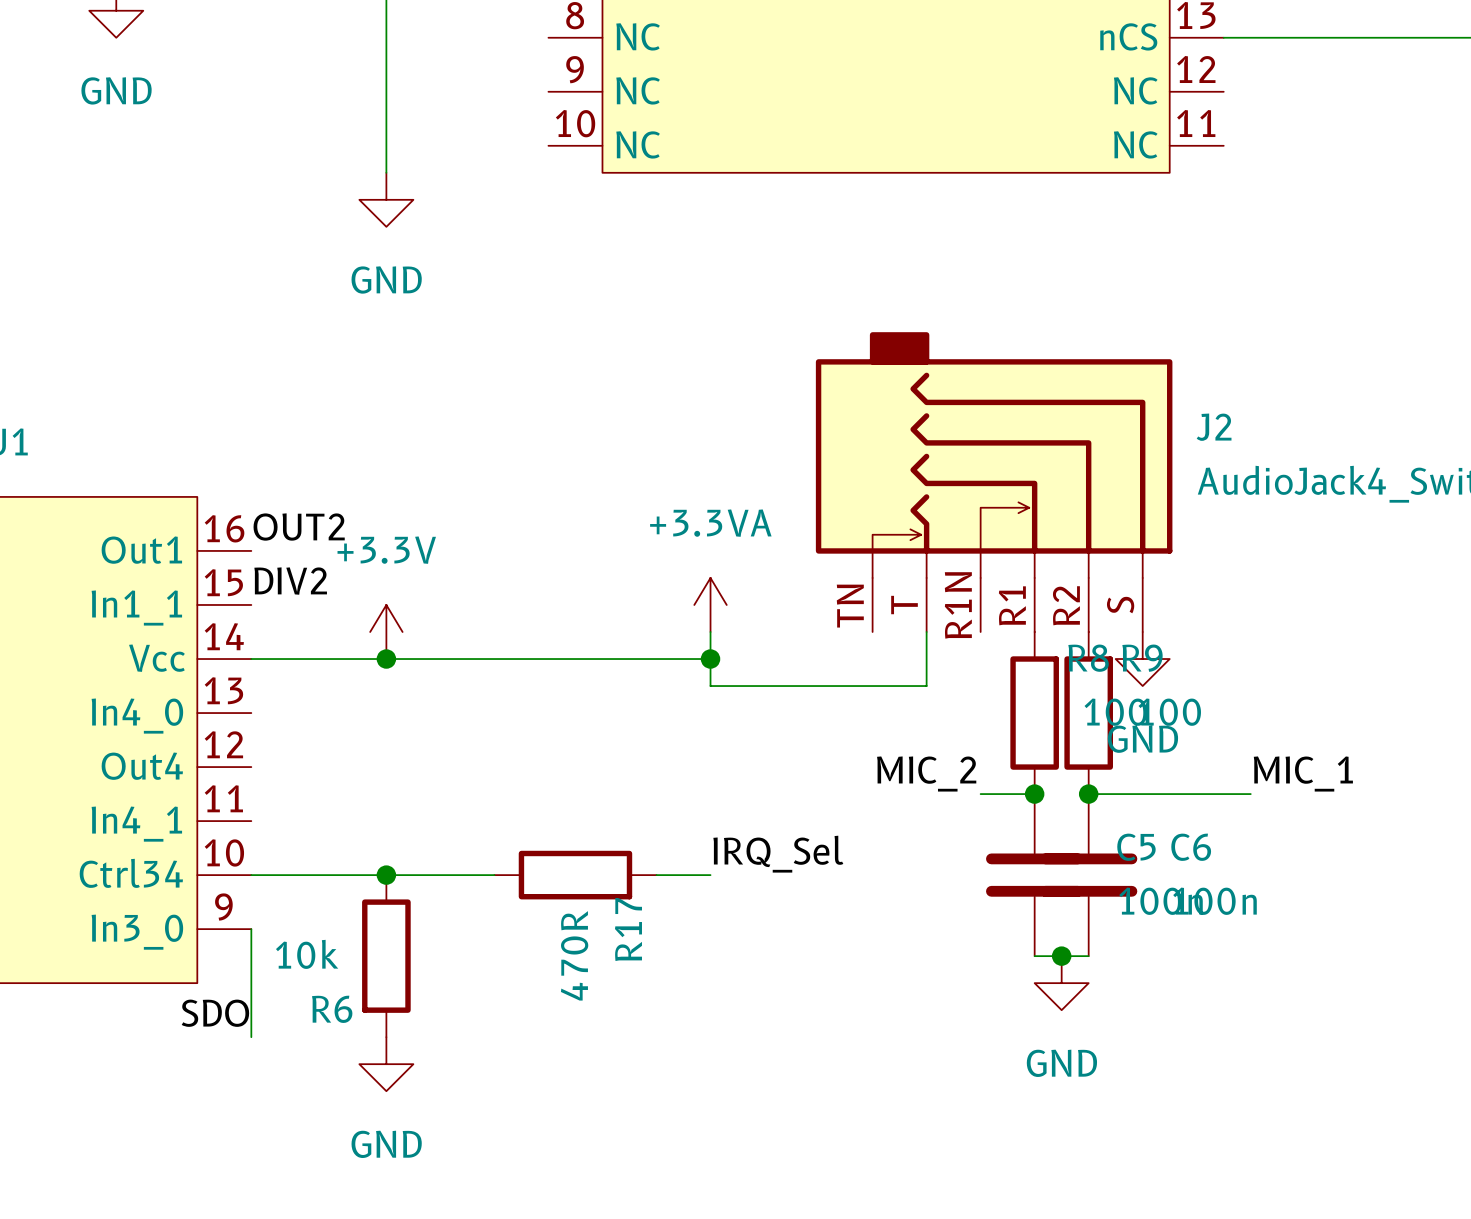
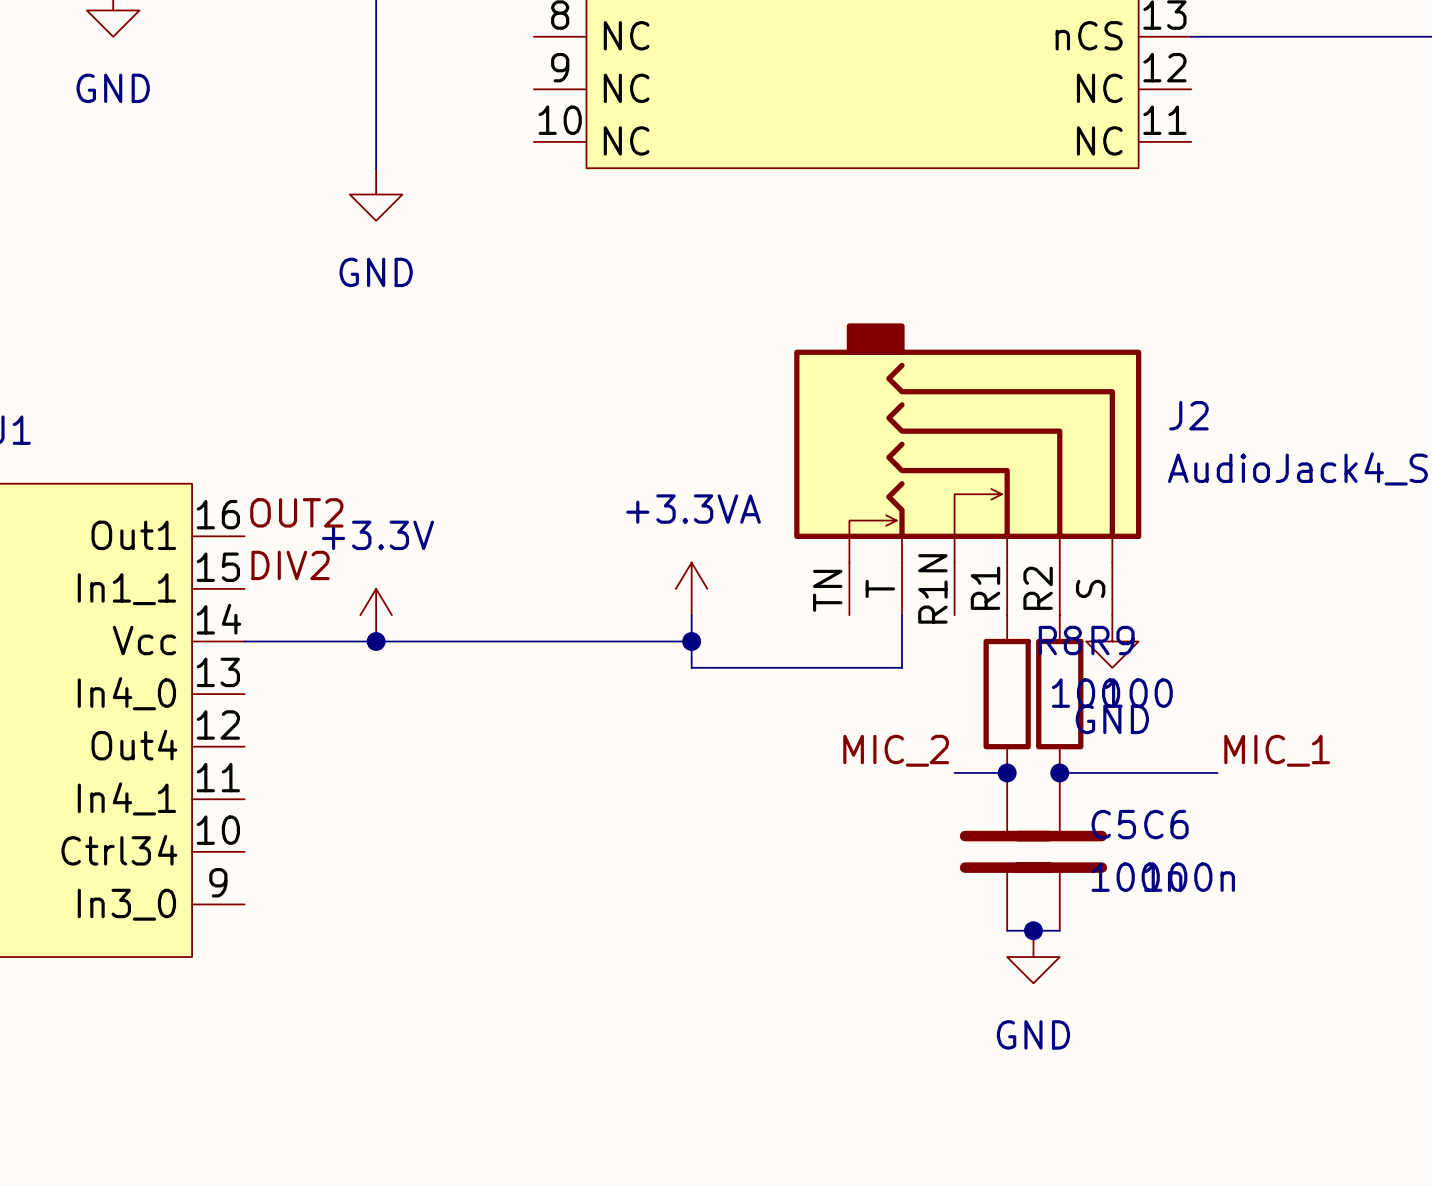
label: IRQ_Sel (778, 854) -> none
wire: (251, 875) (494, 875) -> none
junction: (386, 875) -> none
R17: 470R (575, 875) -> none
wire: (656, 875) (710, 875) -> none
wire: (251, 929) (251, 1037) -> none
R6: 10k (386, 956) -> none
label: SDO (215, 1013) -> none
power symbol: GND (386, 1064) -> none

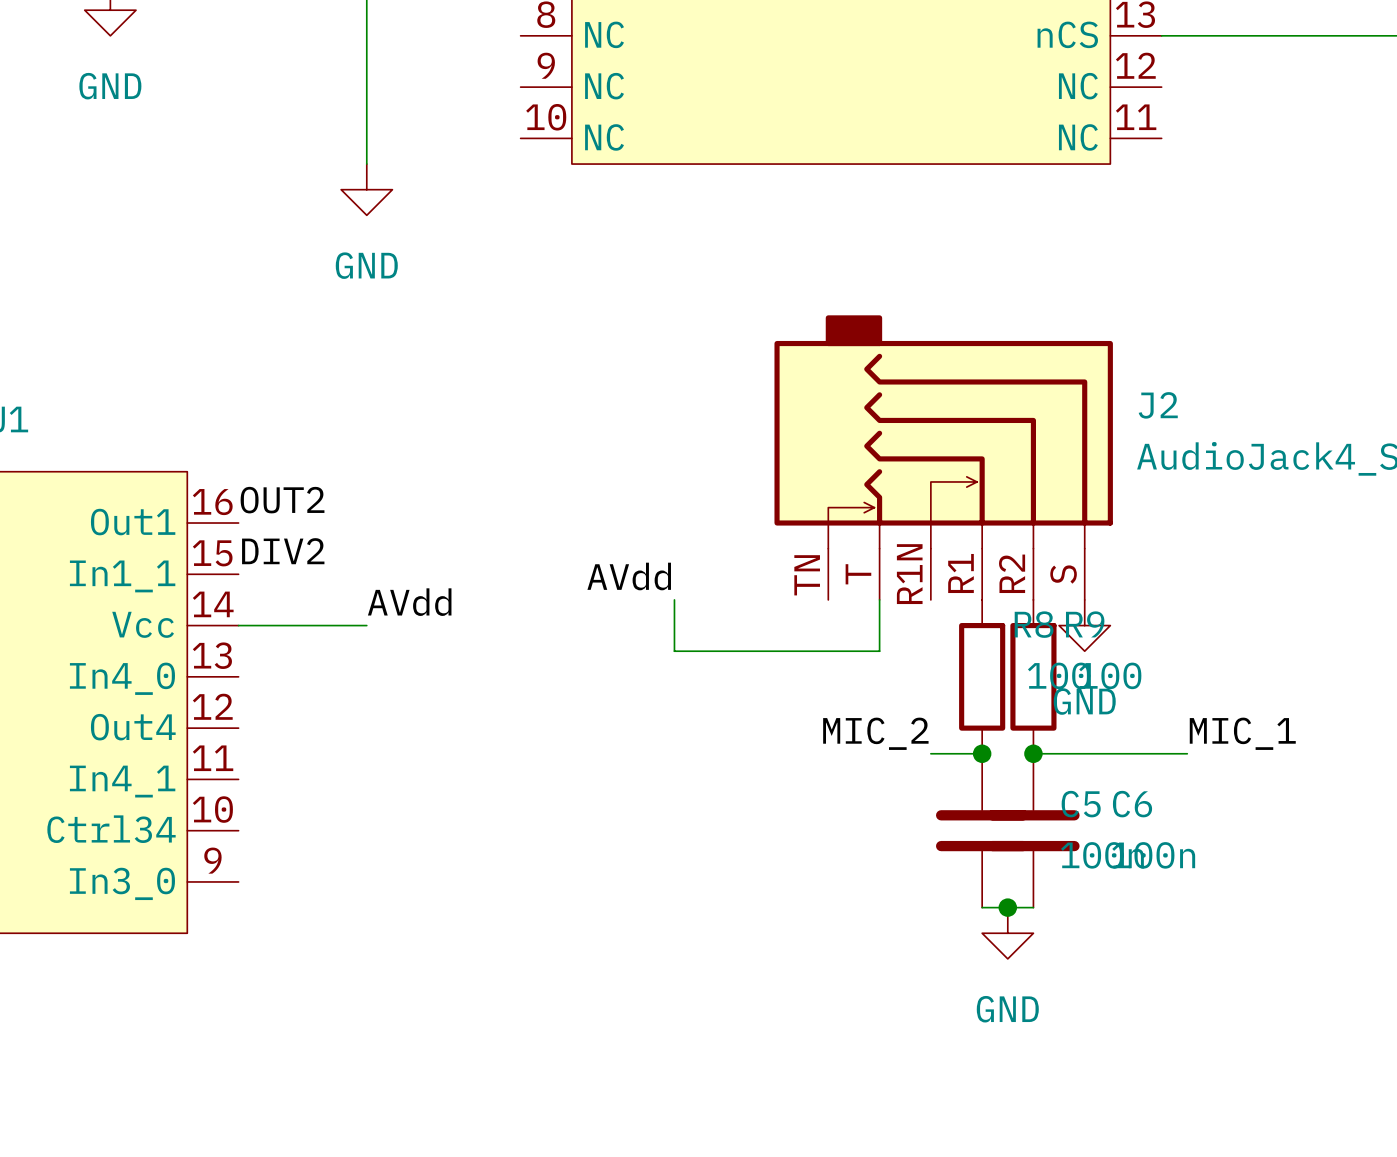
power symbol: +3.3VA (691, 588) -> none
label: none -> AVdd (629, 576)
power symbol: +3.3V (376, 615) -> none
label: none -> AVdd (409, 602)
wire: (376, 641) (691, 641) -> none
junction: (376, 641) -> none
junction: (691, 641) -> none

